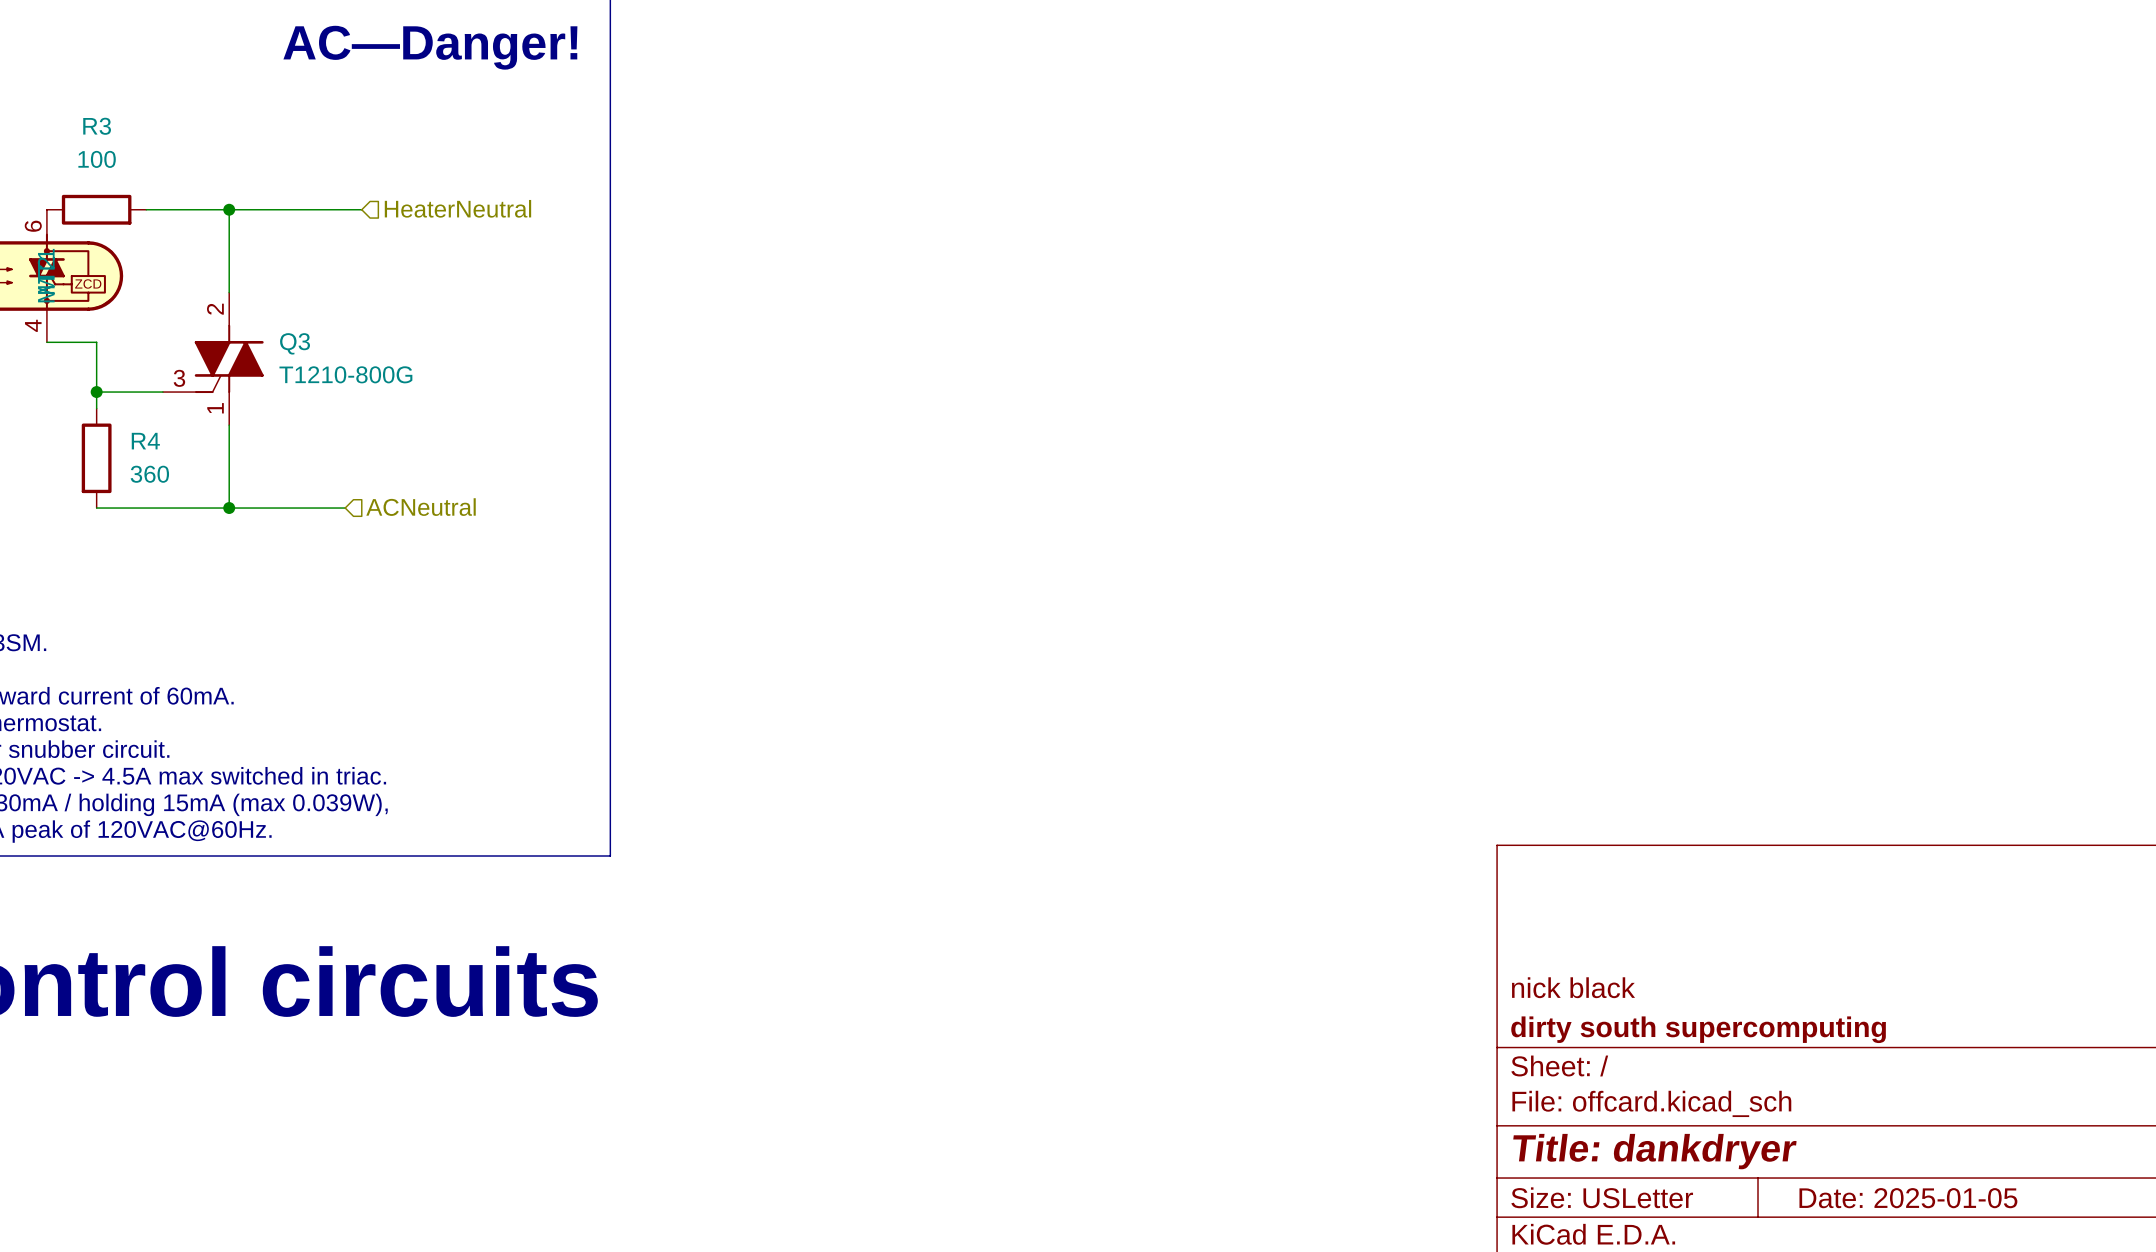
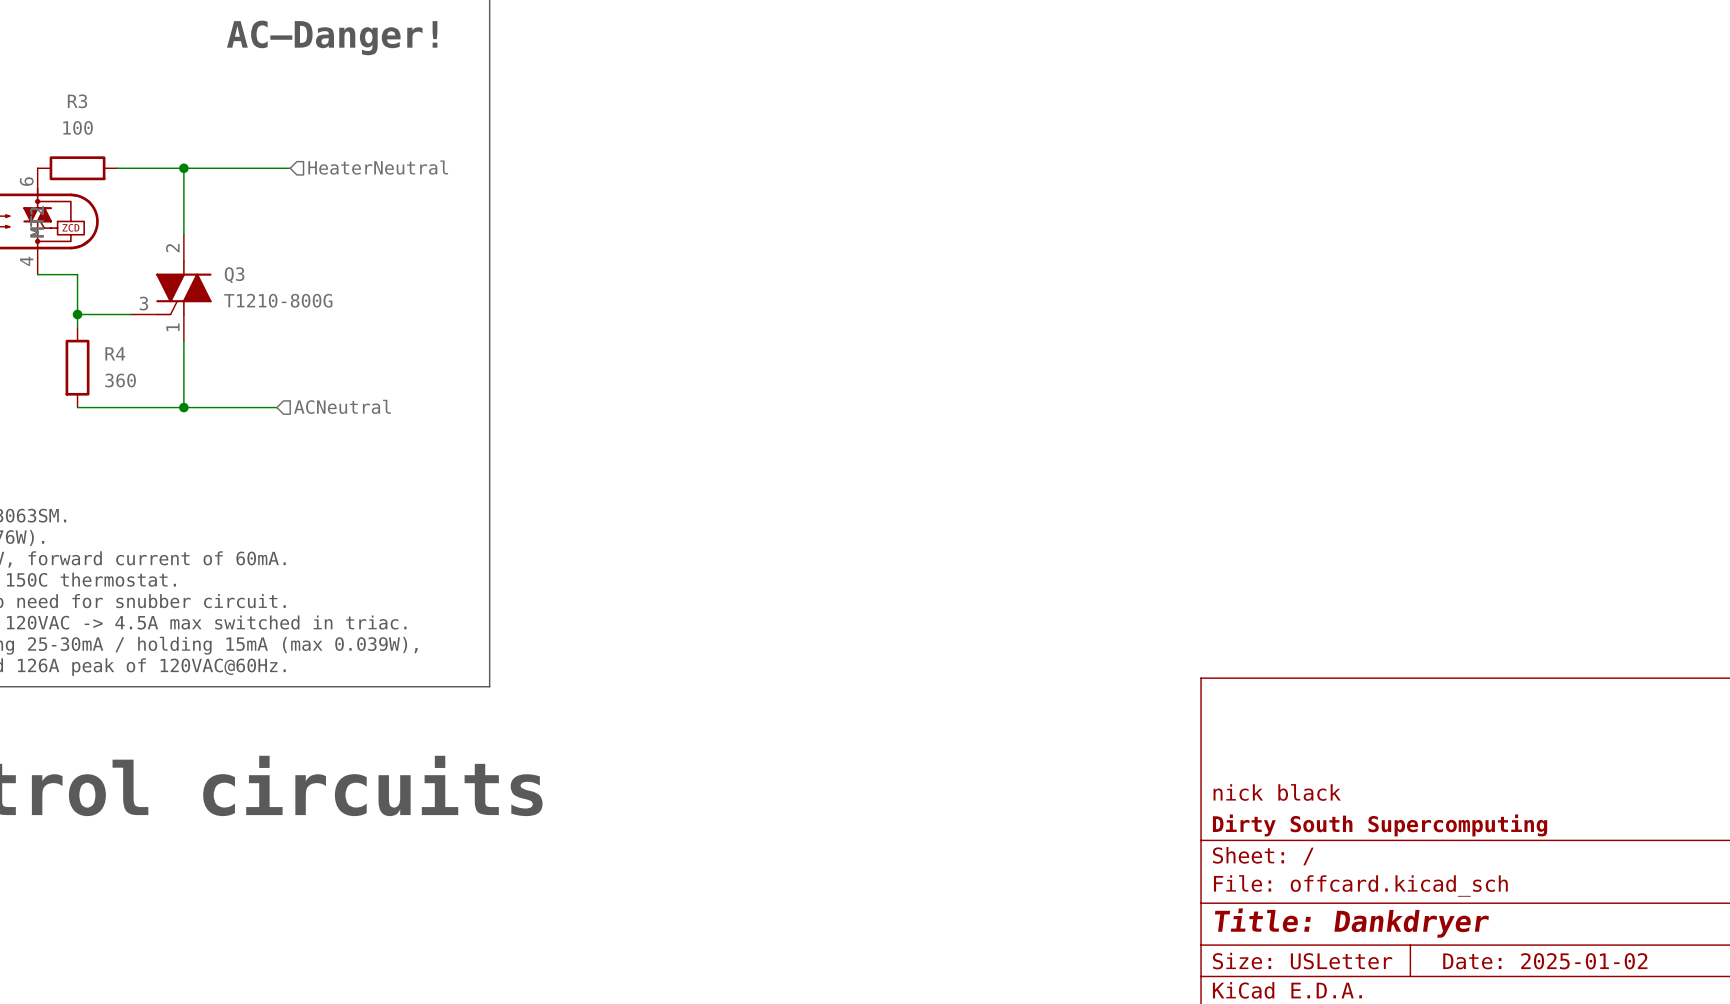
title block: dirty south supercomputing (1698, 1029) -> Dirty South Supercomputing (1380, 825)
title block: Title: dankdryer (1654, 1151) -> Title: Dankdryer (1351, 923)
title block: Date: 2025-01-05 (1908, 1198) -> Date: 2025-01-02 (1545, 961)

